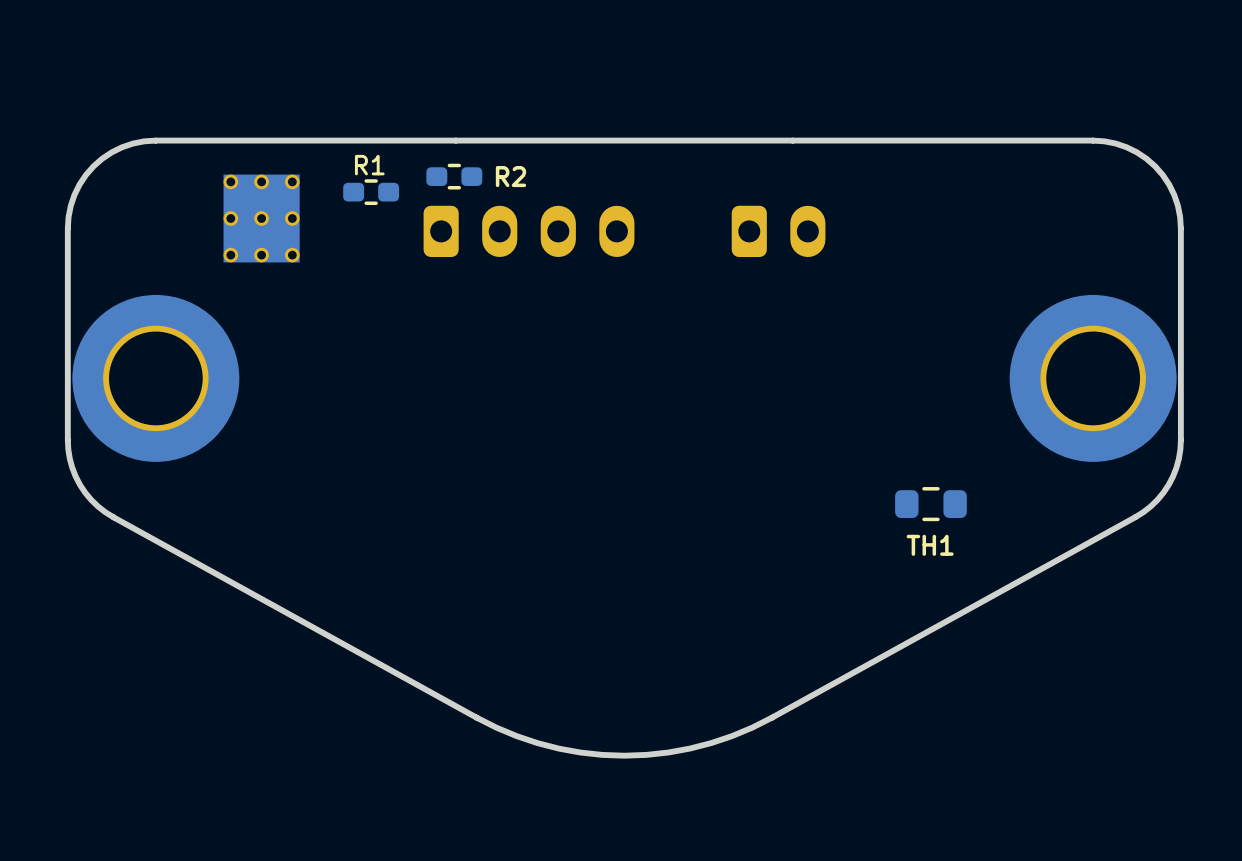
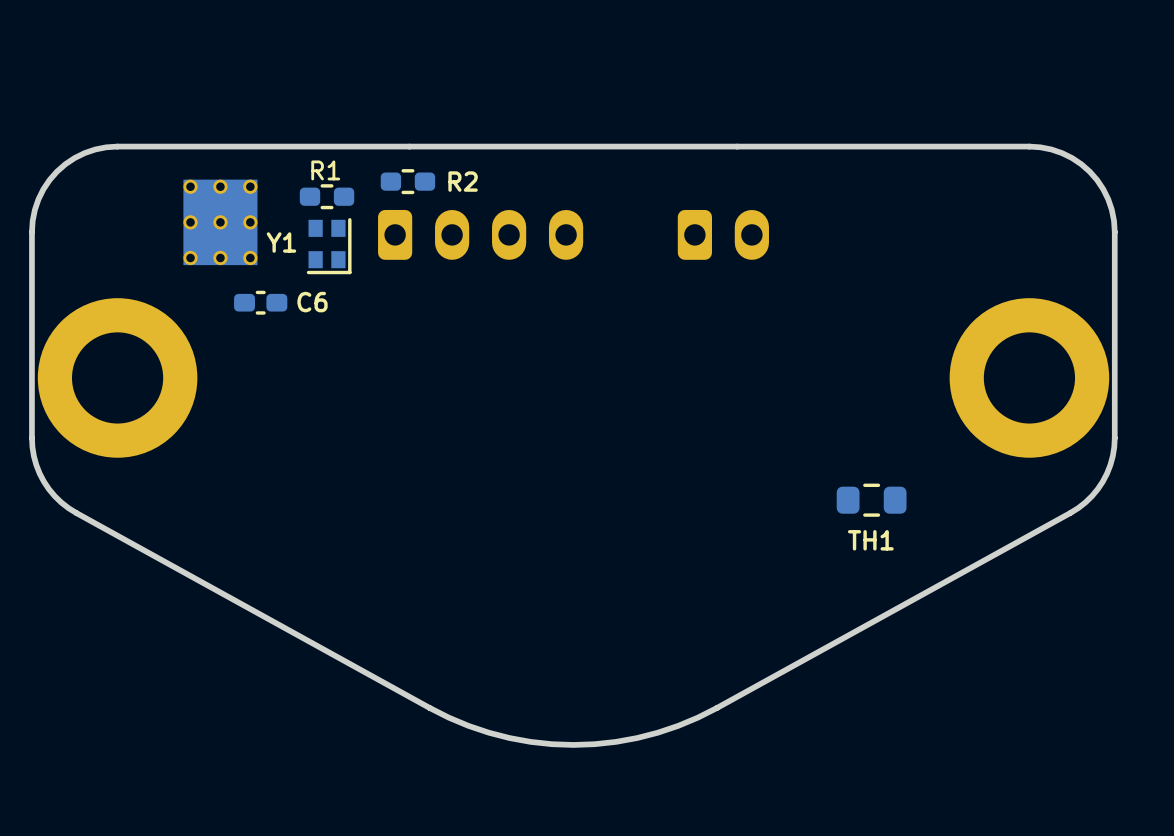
Y1: none -> (329, 246)
part footprint: [72, 294, 240, 462] -> [37, 298, 198, 458]
part footprint: [1009, 294, 1177, 462] -> [949, 298, 1110, 458]
C6: none -> (260, 302)

